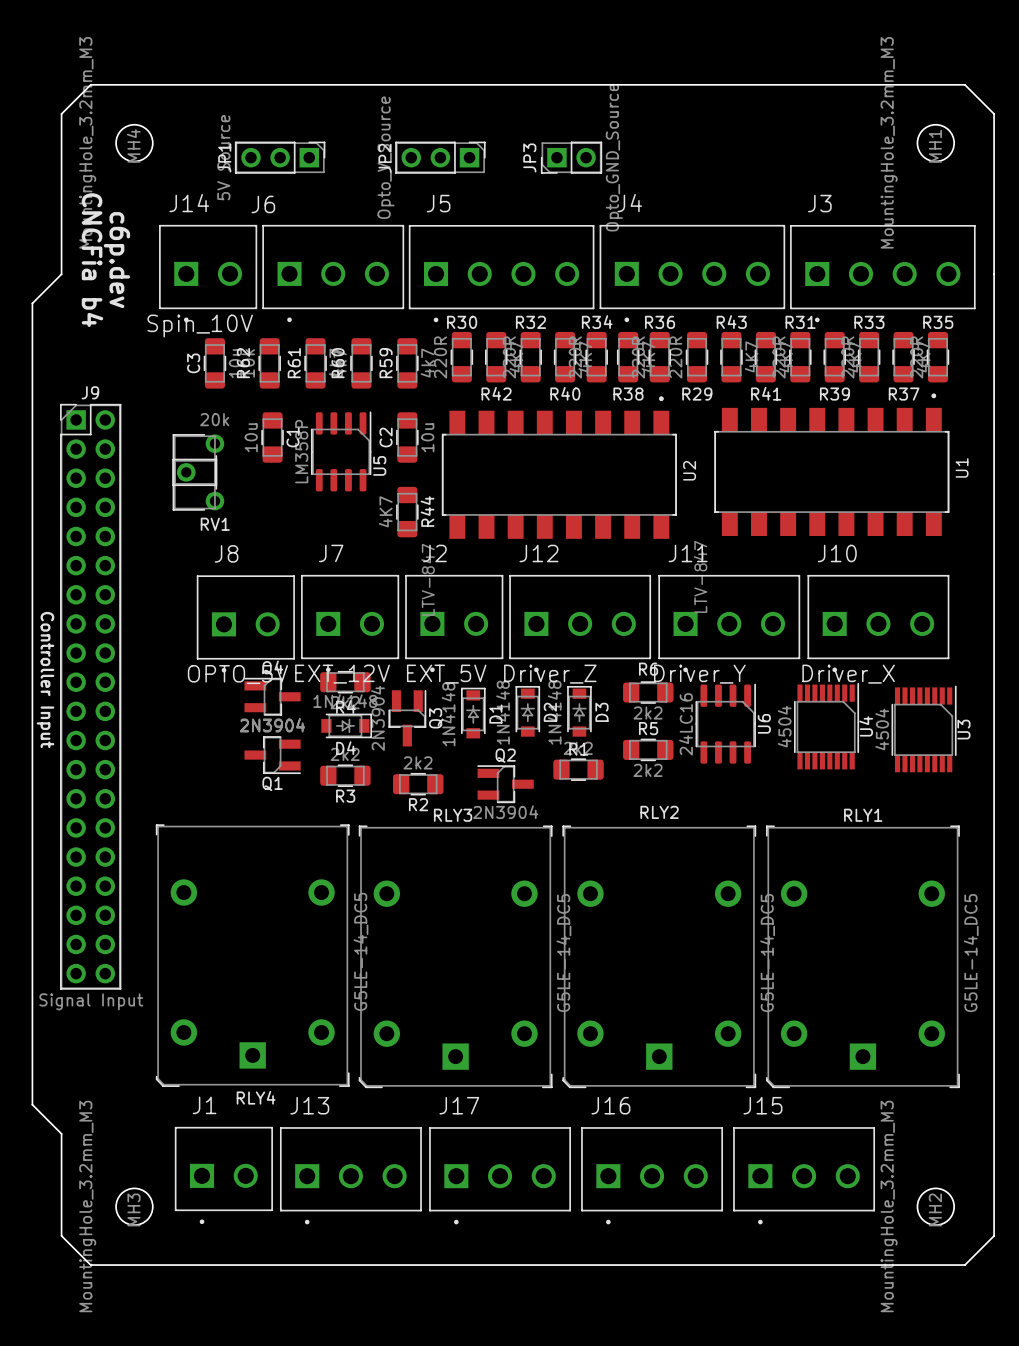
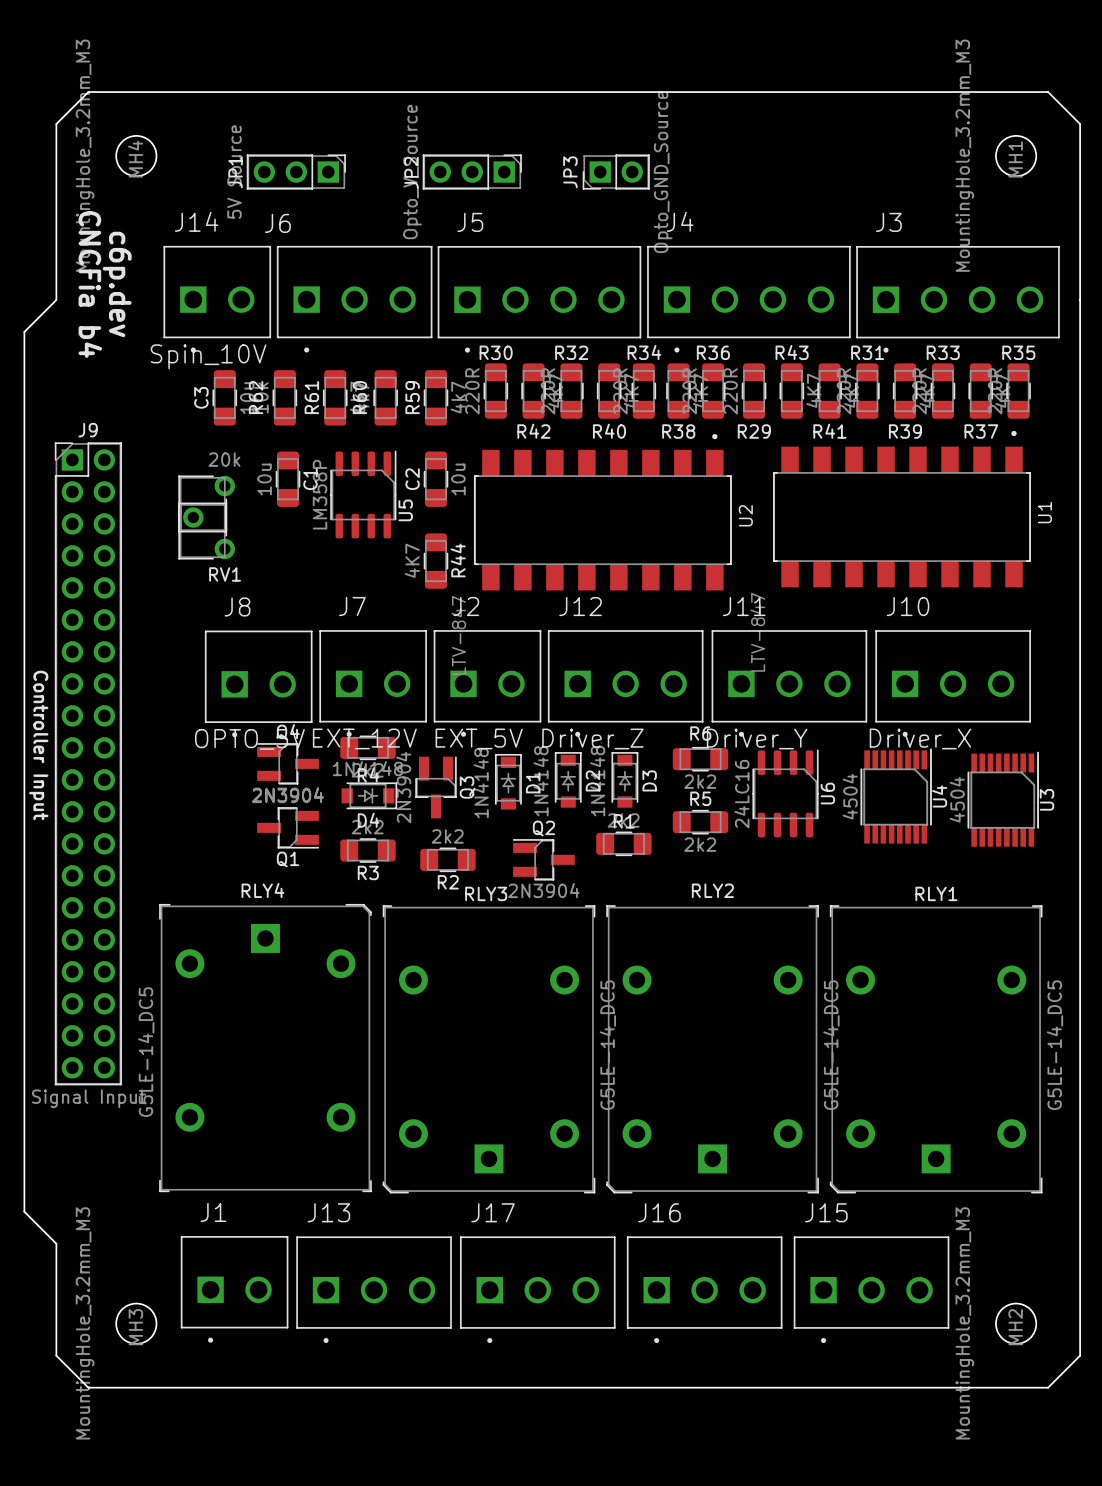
RLY4 rotation: 0° (252, 955) -> 180° (265, 1048)

